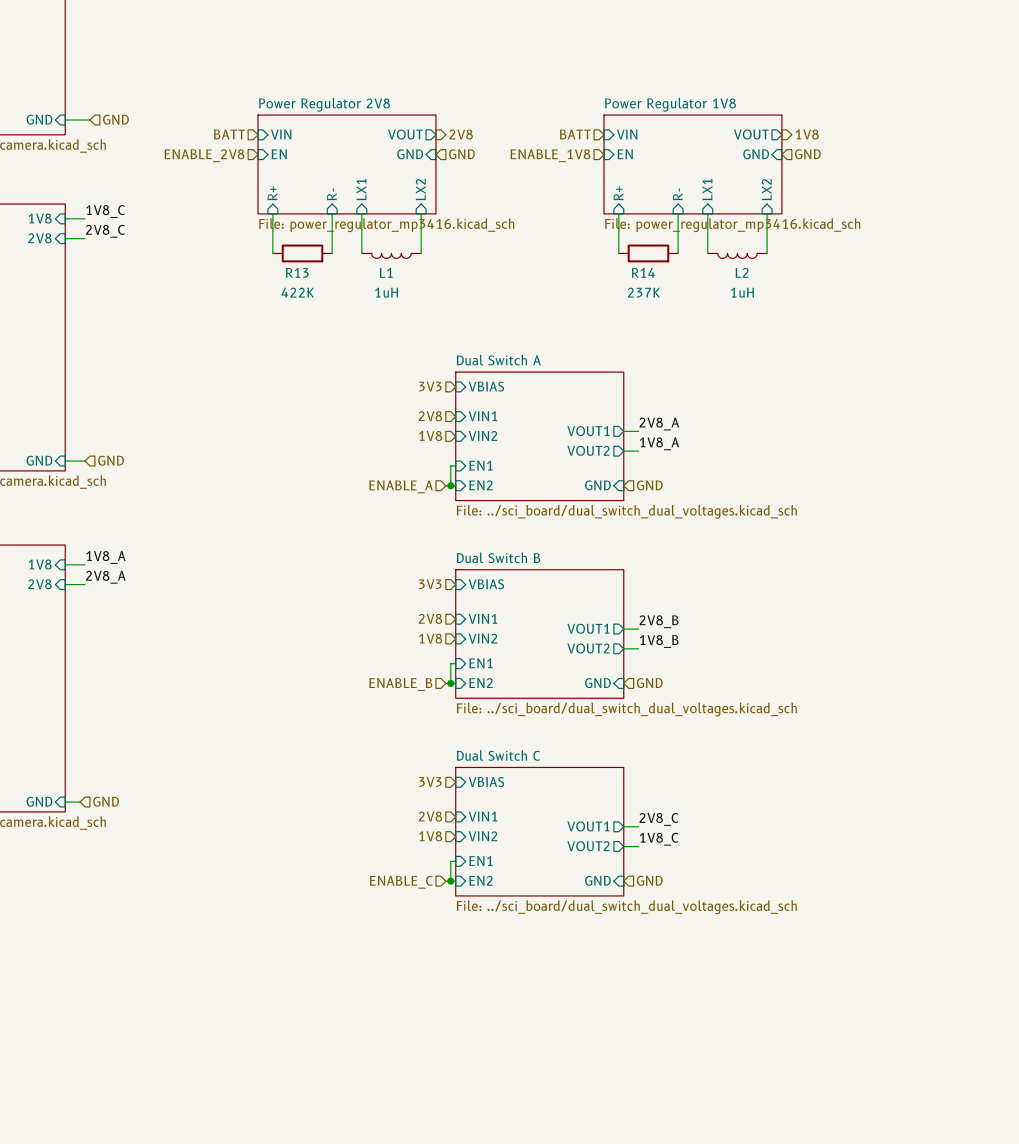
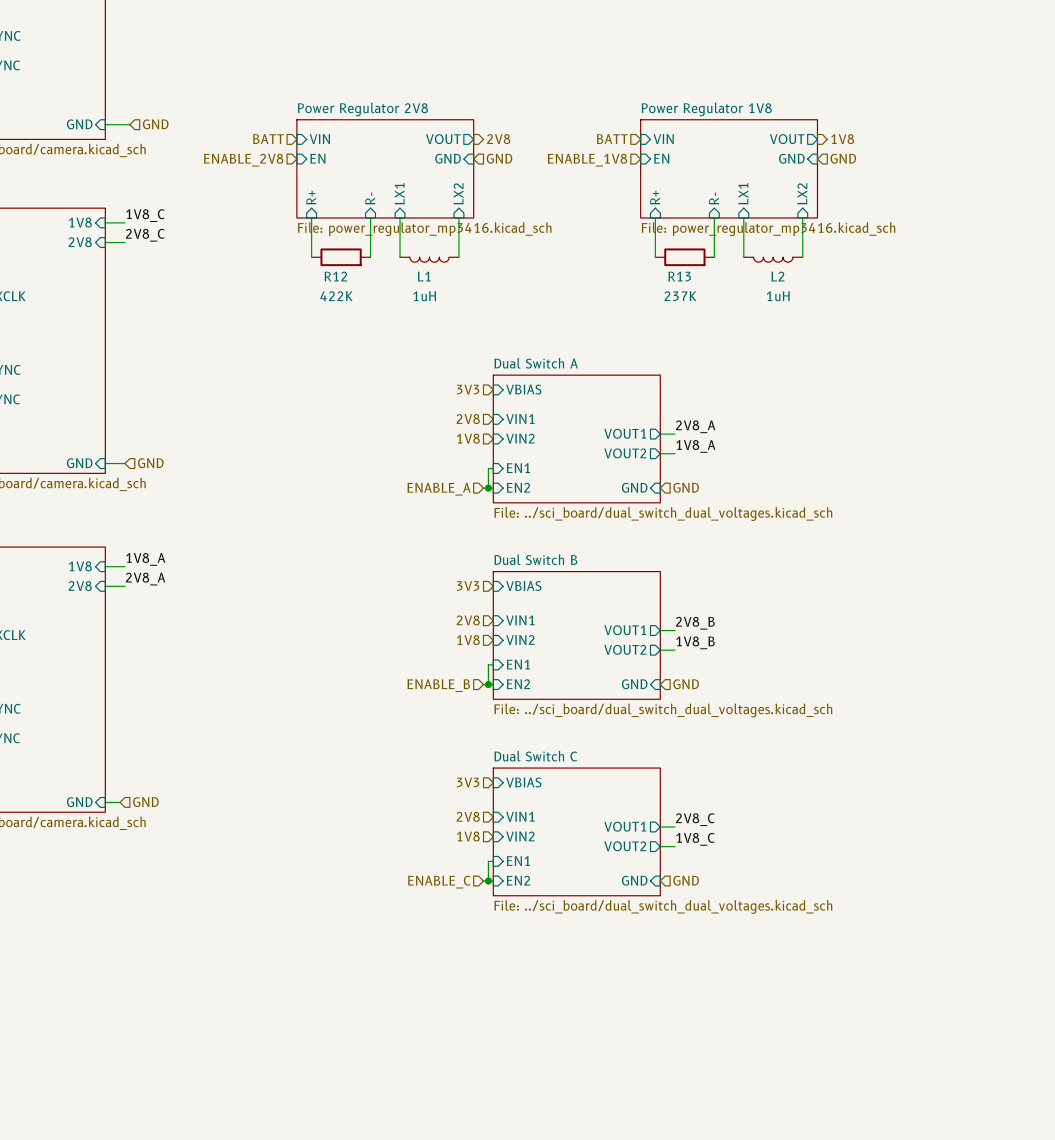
R13 name: R13 (297, 272) -> R12 (335, 276)
R14 name: R14 (643, 272) -> R13 (679, 276)

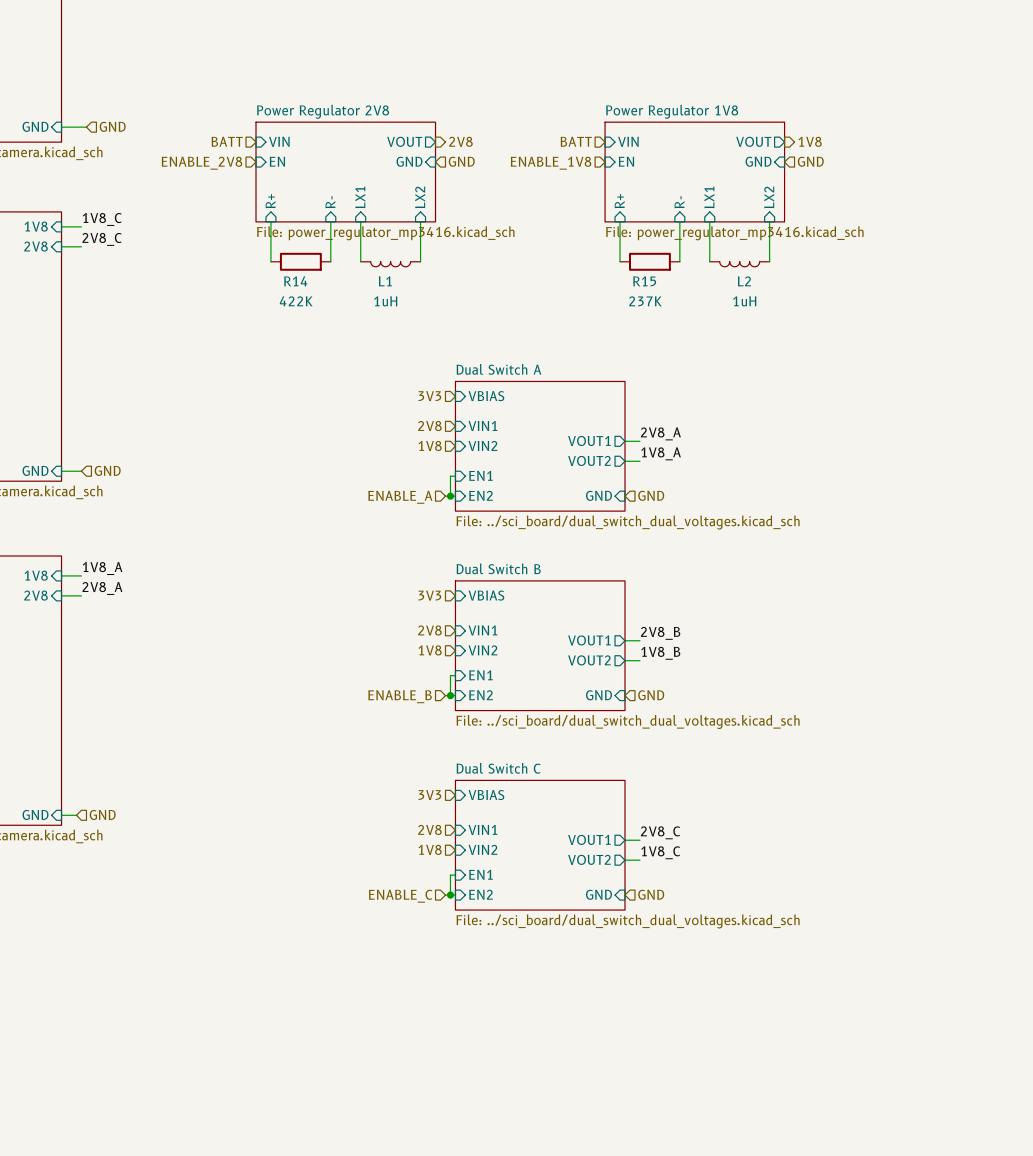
R12 name: R12 (335, 276) -> R14 (295, 281)
R13 name: R13 (679, 276) -> R15 (644, 281)

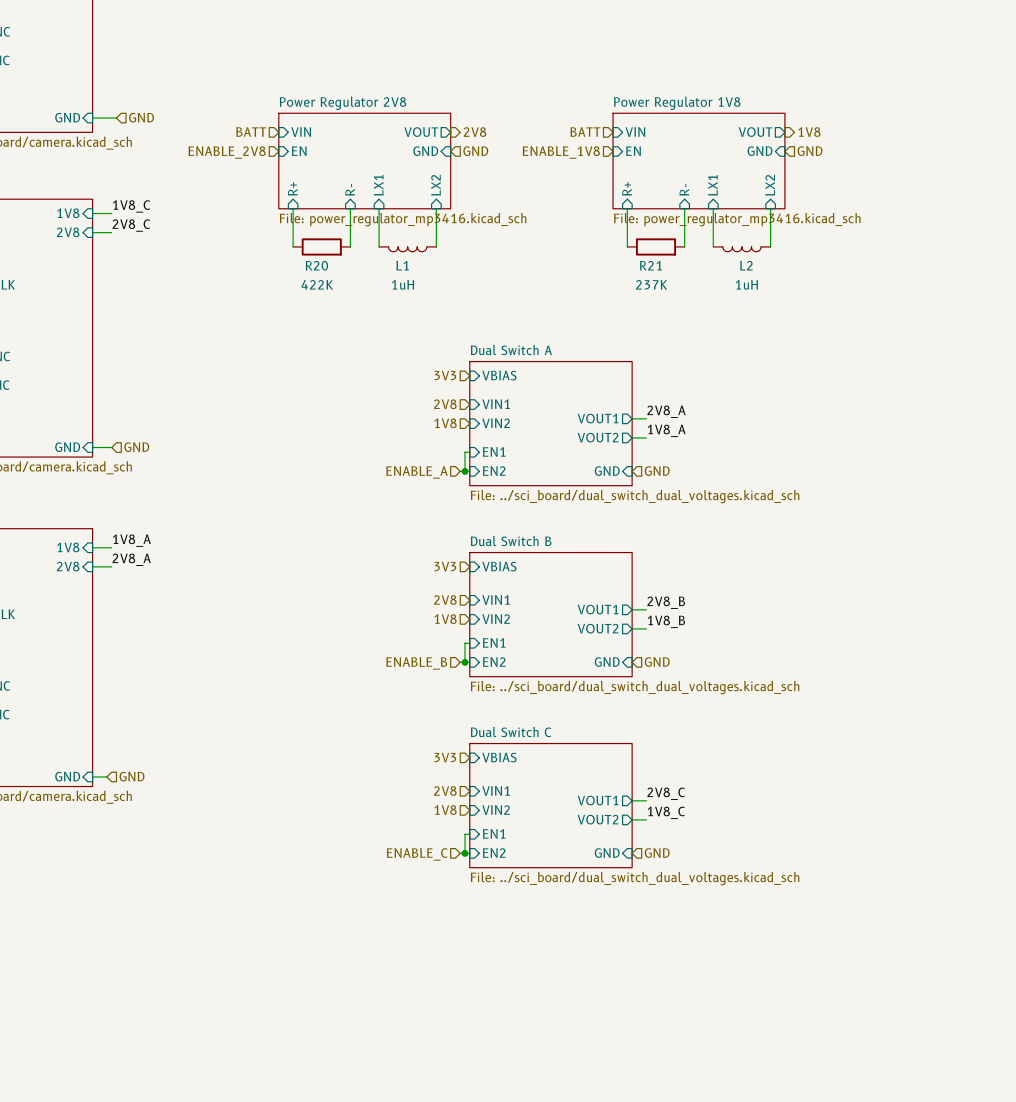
R14 name: R14 (295, 281) -> R20 (316, 265)
R15 name: R15 (644, 281) -> R21 (650, 265)

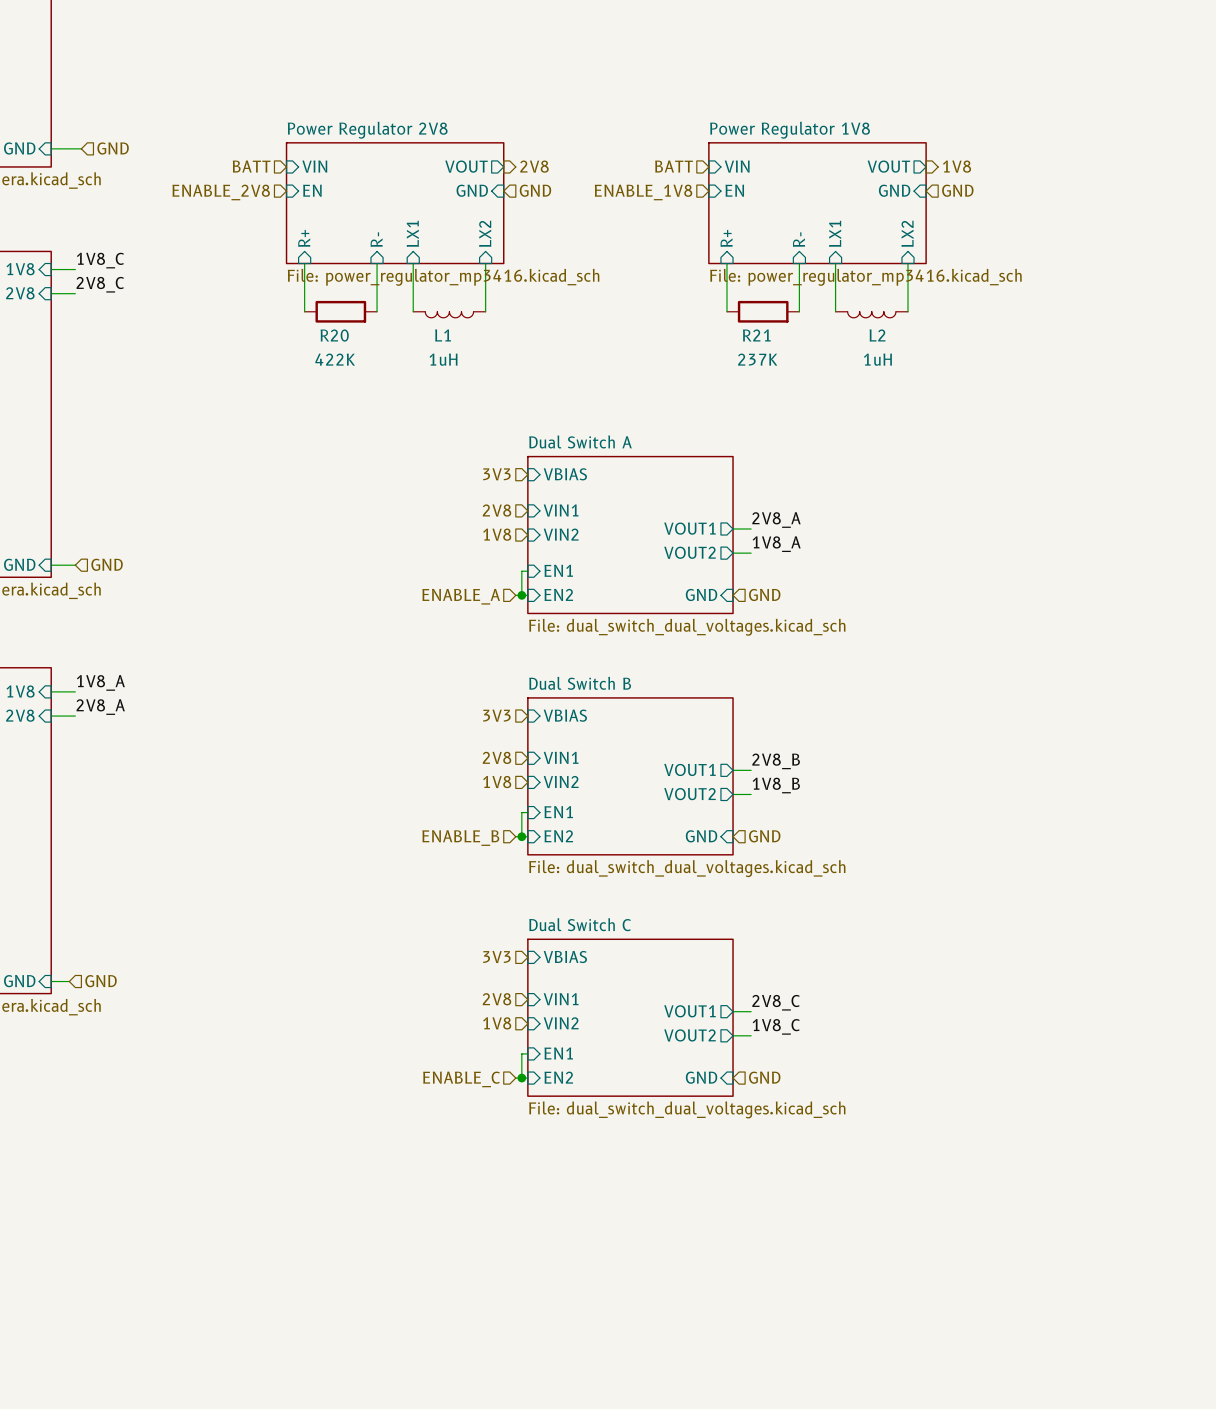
sheet Dual Switch A value: File: ../sci_board/dual_switch_dual_voltages.kicad_sch (635, 496) -> File: dual_switch_dual_voltages.kicad_sch (687, 627)
sheet Dual Switch B value: File: ../sci_board/dual_switch_dual_voltages.kicad_sch (635, 687) -> File: dual_switch_dual_voltages.kicad_sch (687, 868)
sheet Dual Switch C value: File: ../sci_board/dual_switch_dual_voltages.kicad_sch (635, 878) -> File: dual_switch_dual_voltages.kicad_sch (687, 1109)

